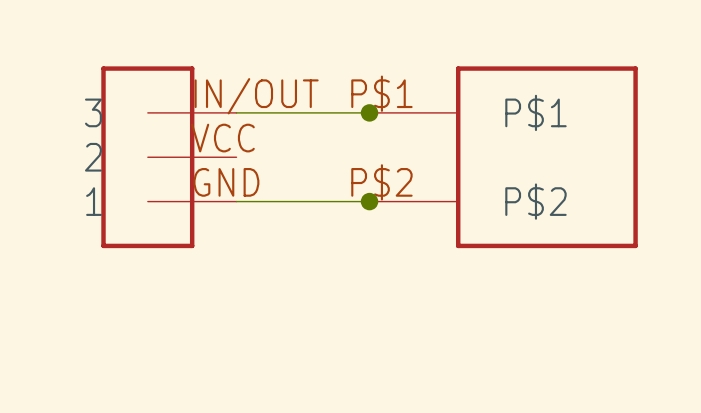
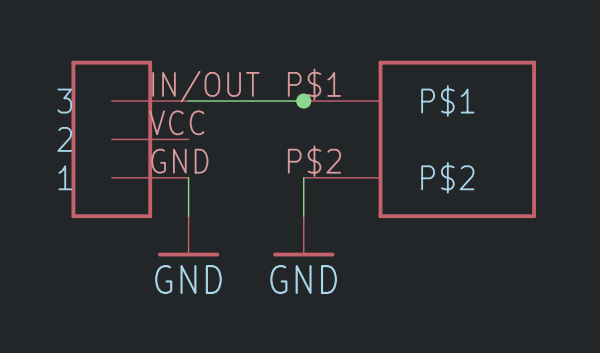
wire: (236, 201) (369, 201) -> (188, 177) (188, 216)
wire: none -> (303, 177) (303, 216)
junction: (369, 201) -> none
power symbol: none -> GND (188, 236)
power symbol: none -> GND (303, 236)

